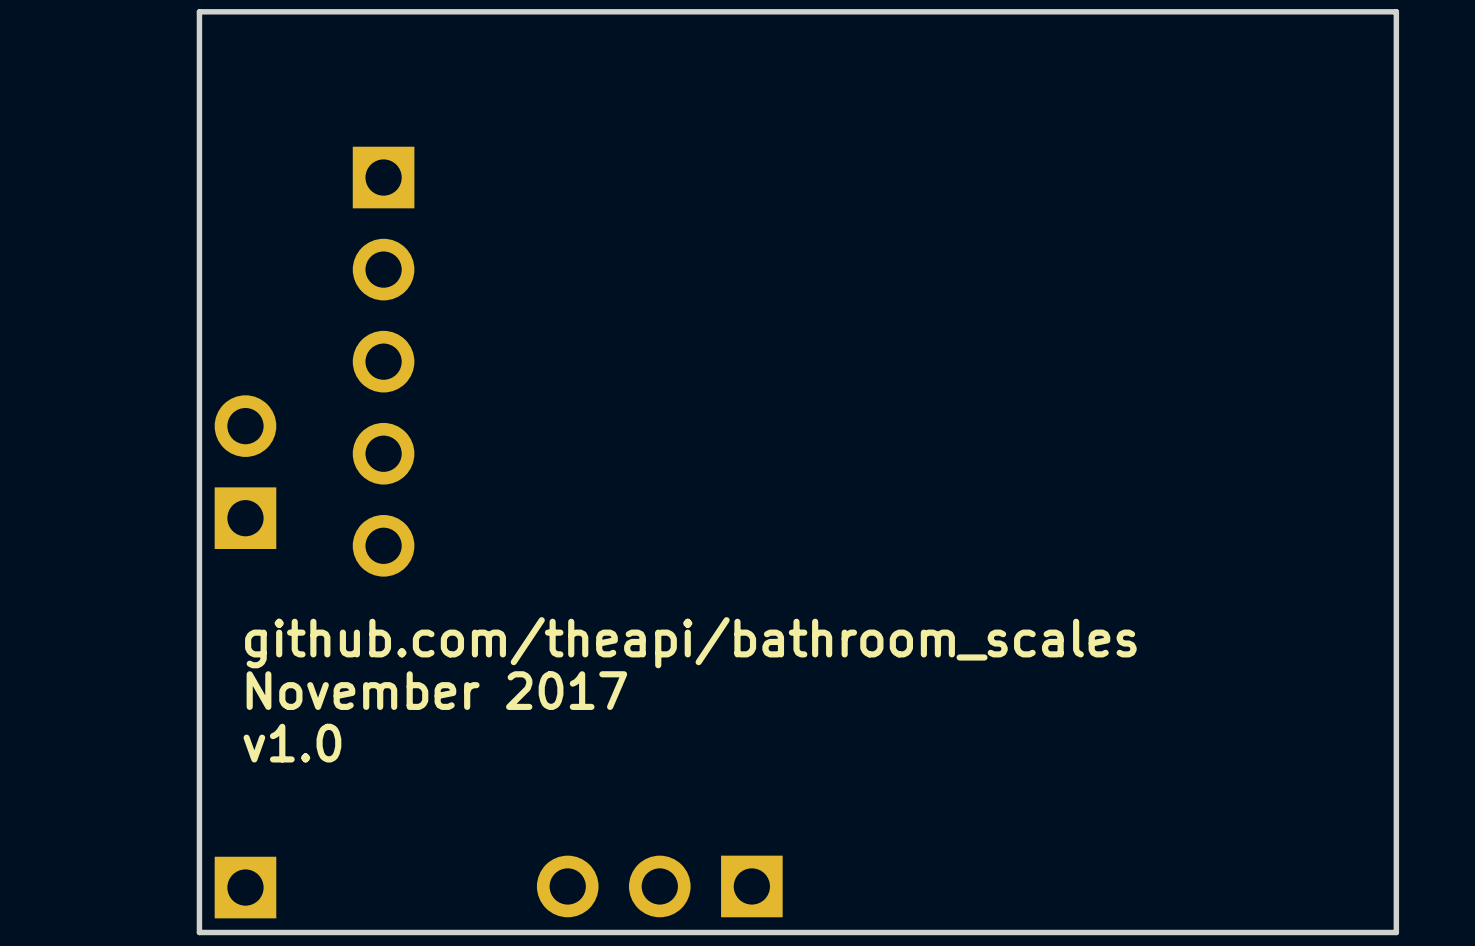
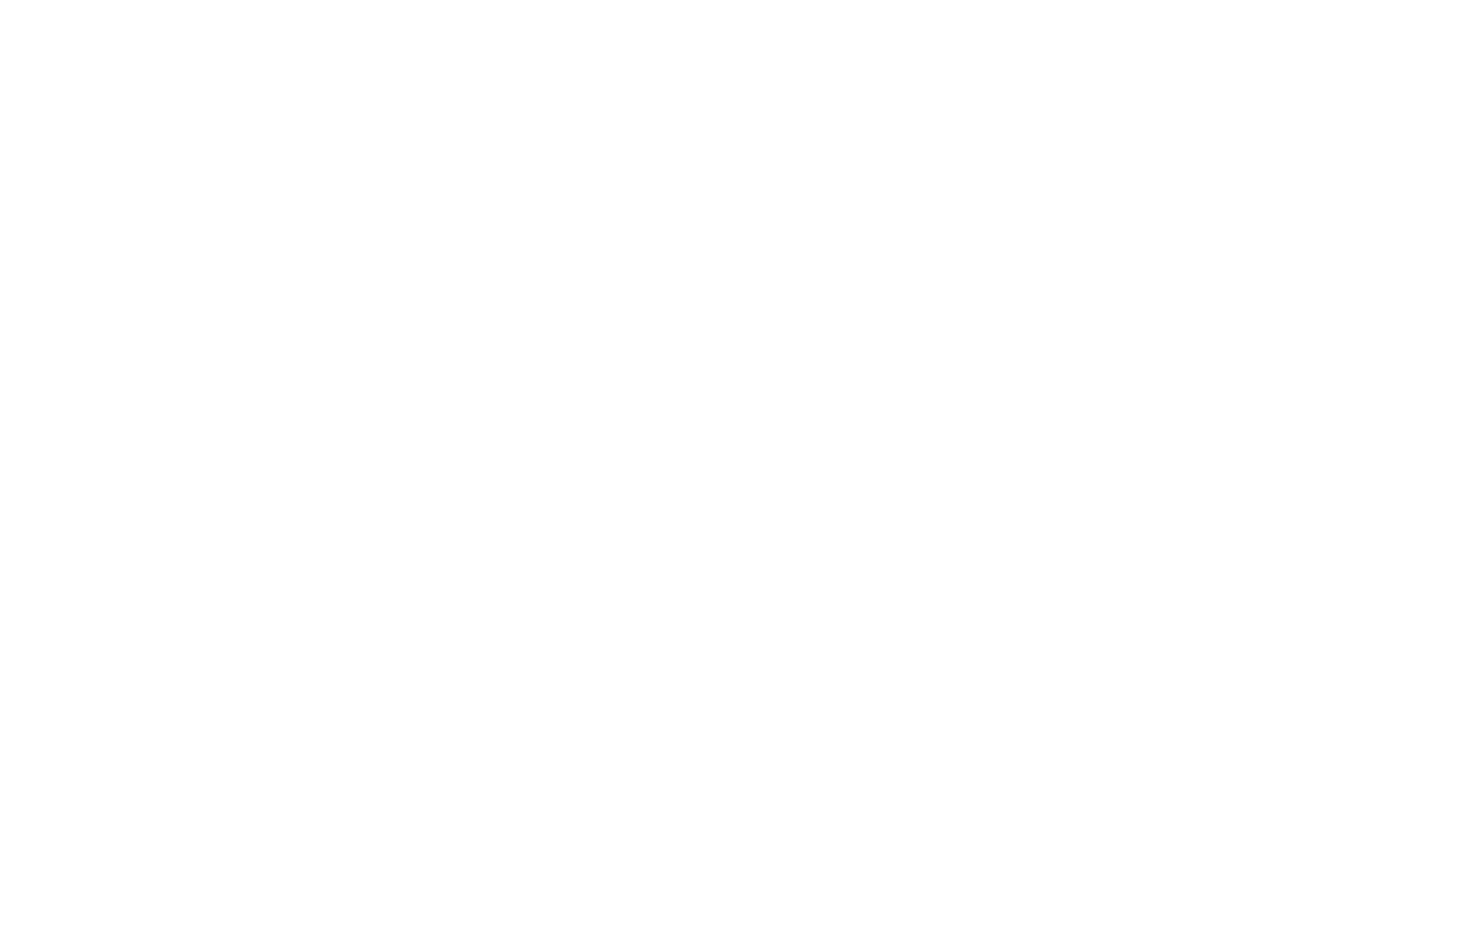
board edge: (1396, 11) (1396, 932) (199, 932) (199, 11) (1396, 11) -> none
part: (383, 361) -> none
part: (245, 472) -> none
text: github.com/theapi/bathroom_scales (690, 642) -> none
text: November 2017 (436, 690) -> none
text: v1.0 (292, 743) -> none
part: (659, 886) -> none
part: (245, 887) -> none

